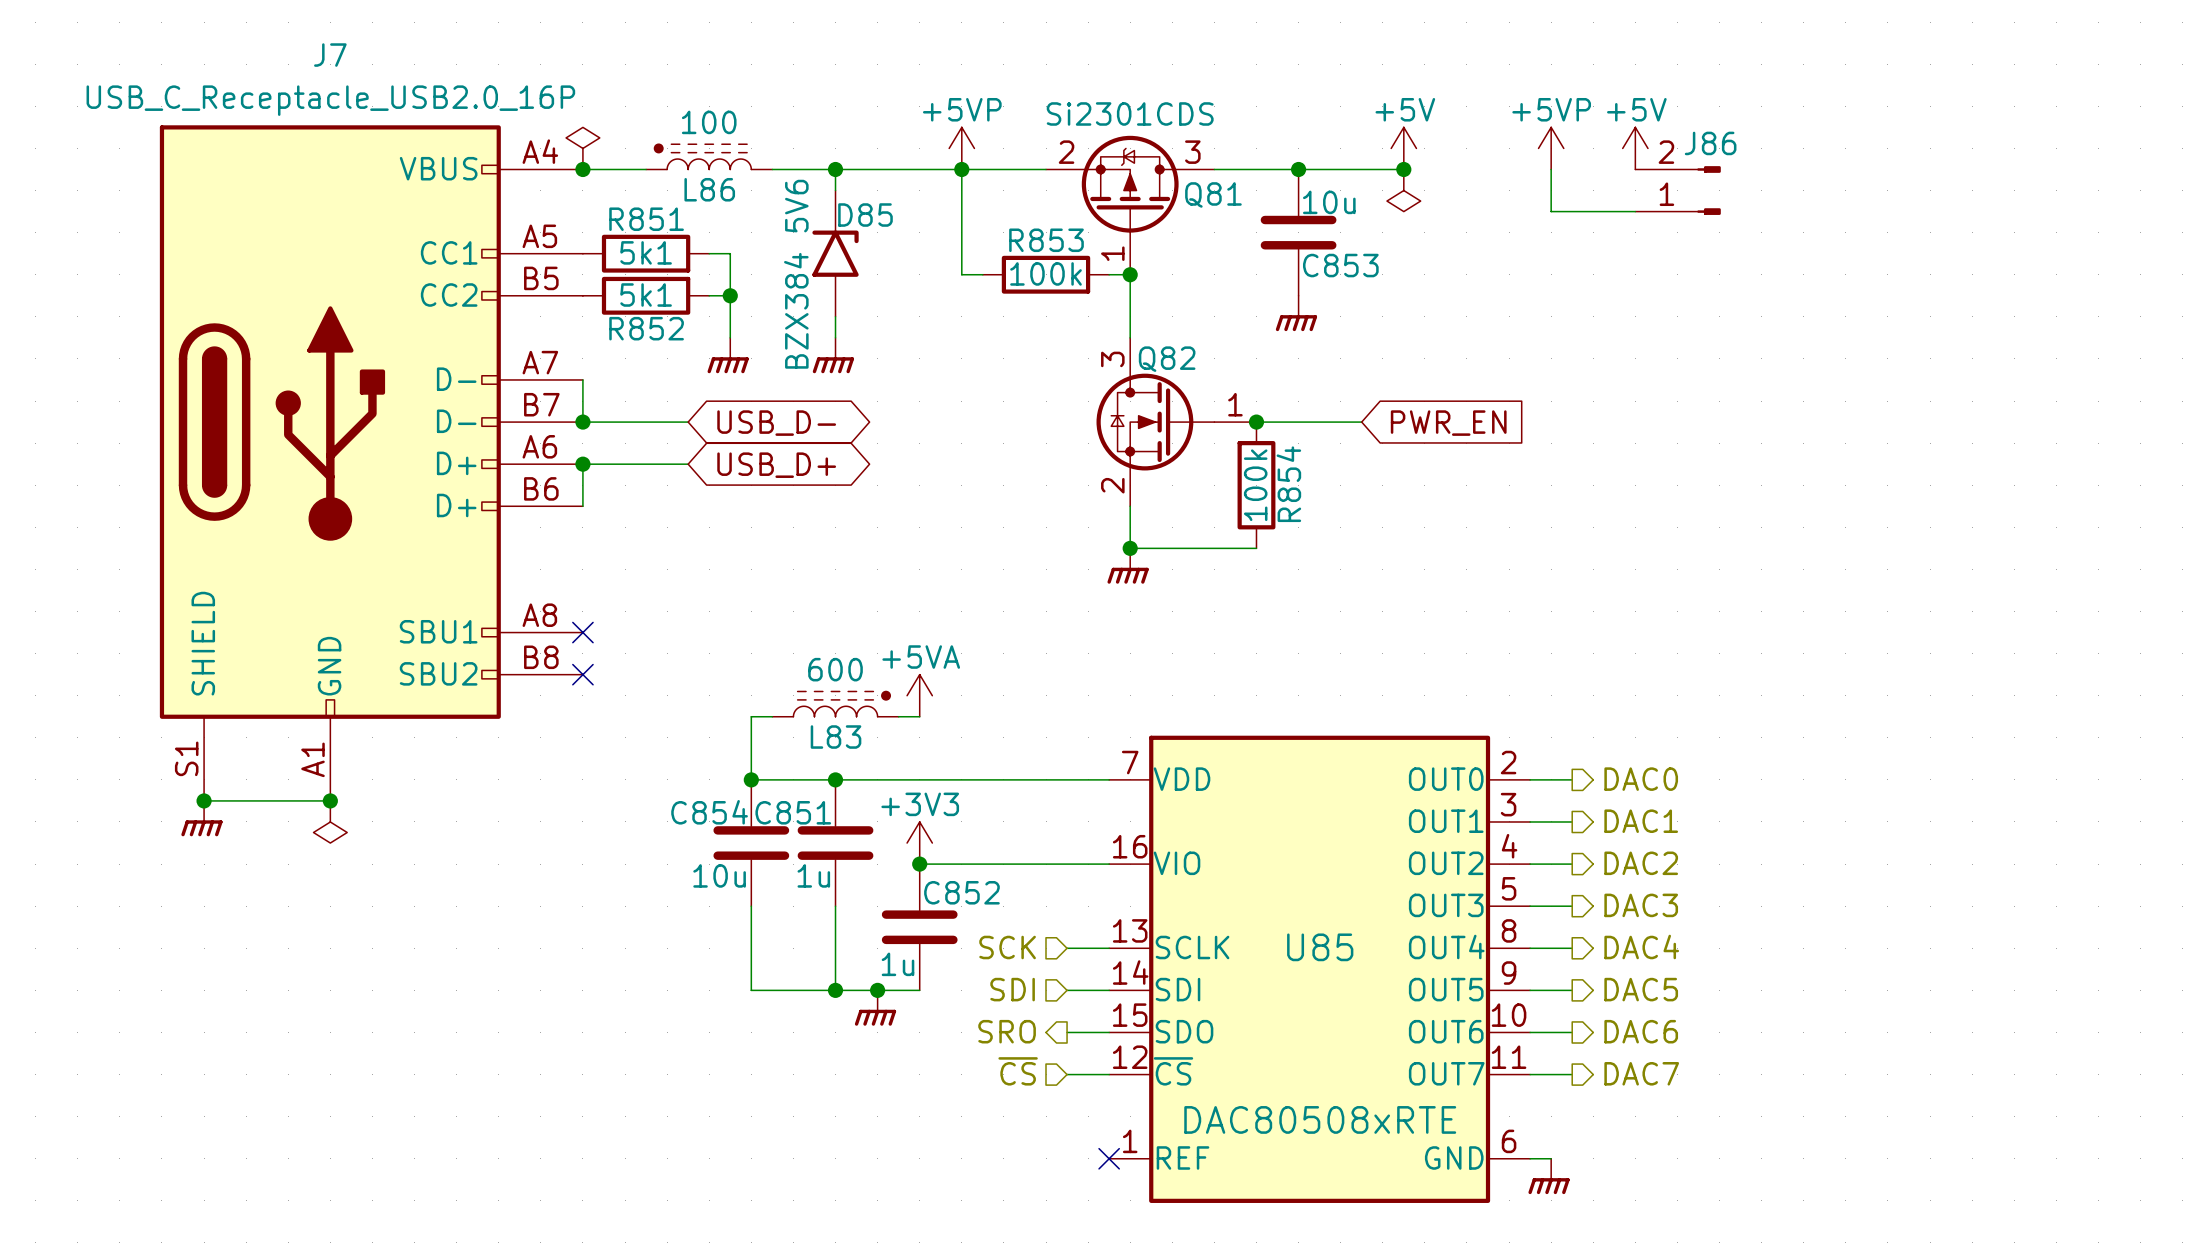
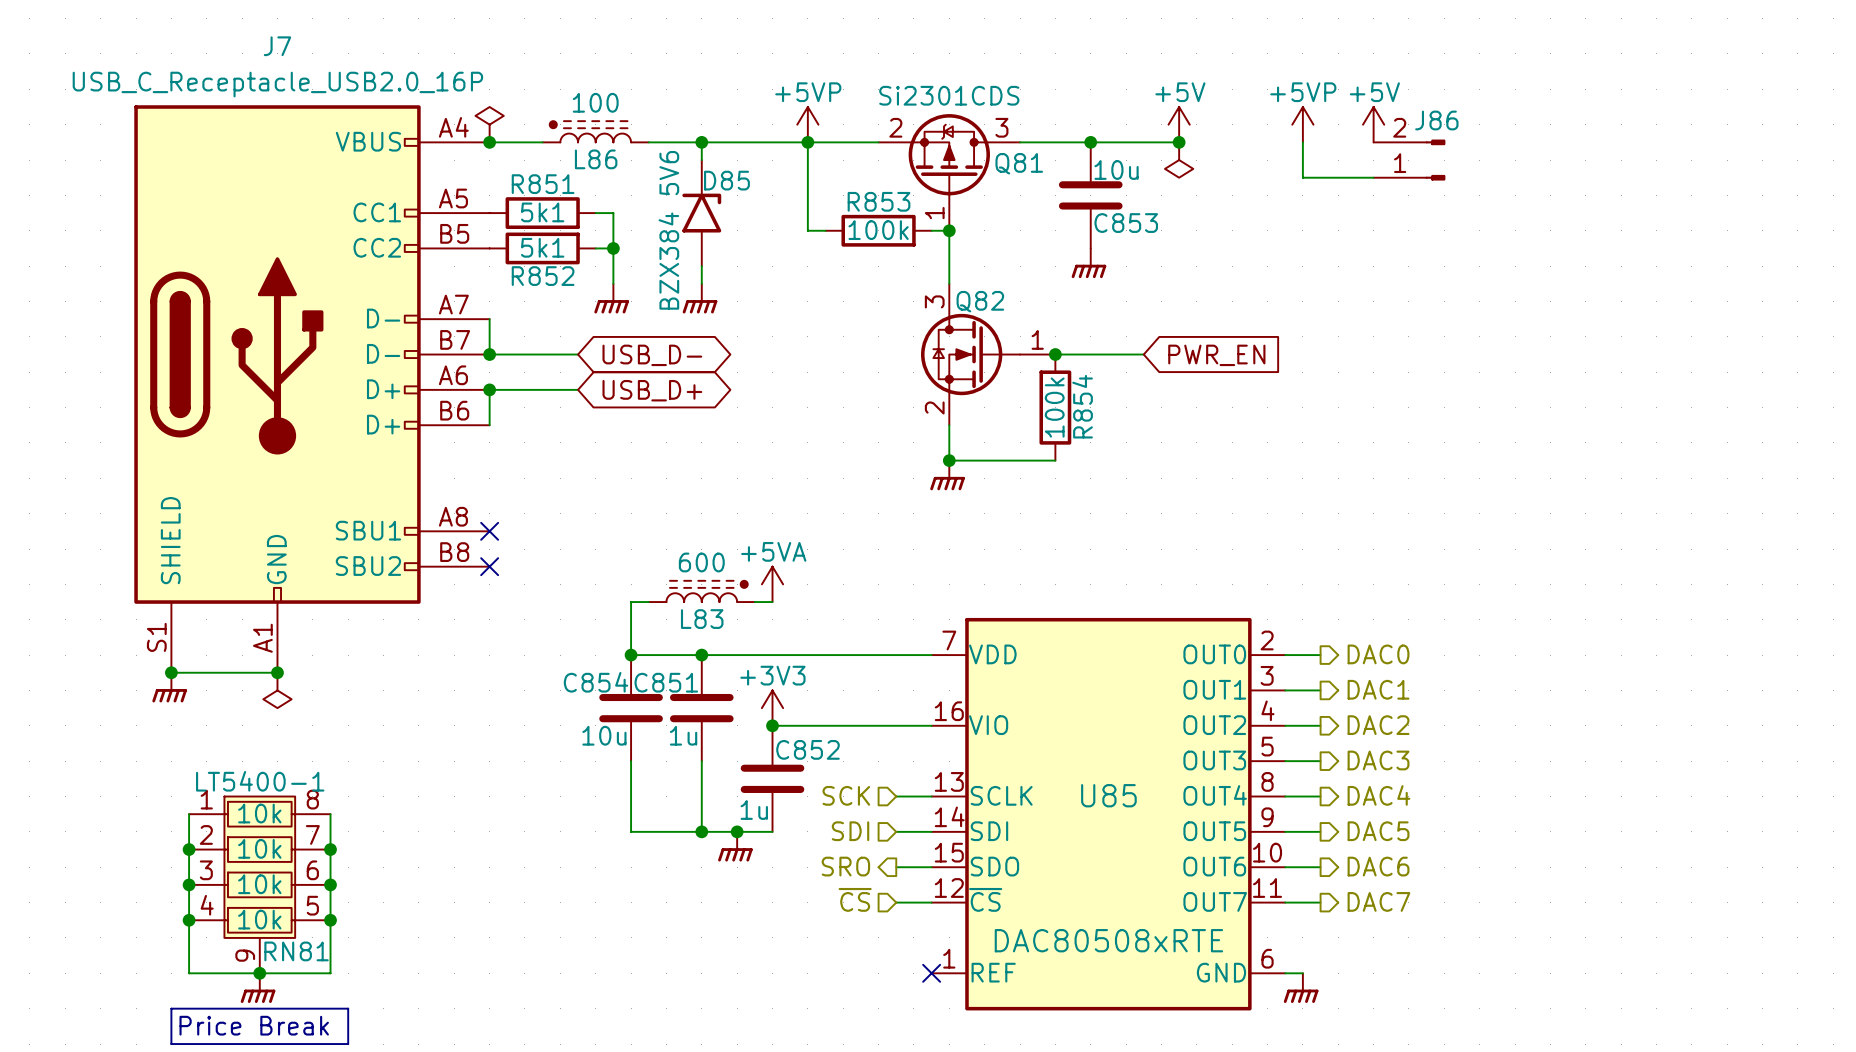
wire: none -> (189, 814) (189, 973) (330, 973) (330, 814)
junction: none -> (189, 849)
junction: none -> (330, 849)
junction: none -> (189, 884)
RN81: none -> LT5400-1 (259, 884)
junction: none -> (330, 884)
junction: none -> (189, 920)
junction: none -> (330, 920)
junction: none -> (259, 973)
power symbol: none -> (258, 988)
line: none -> (171, 1008) (348, 1008) (348, 1044) (171, 1044) (171, 1008)
text: none -> Price Break (254, 1025)

